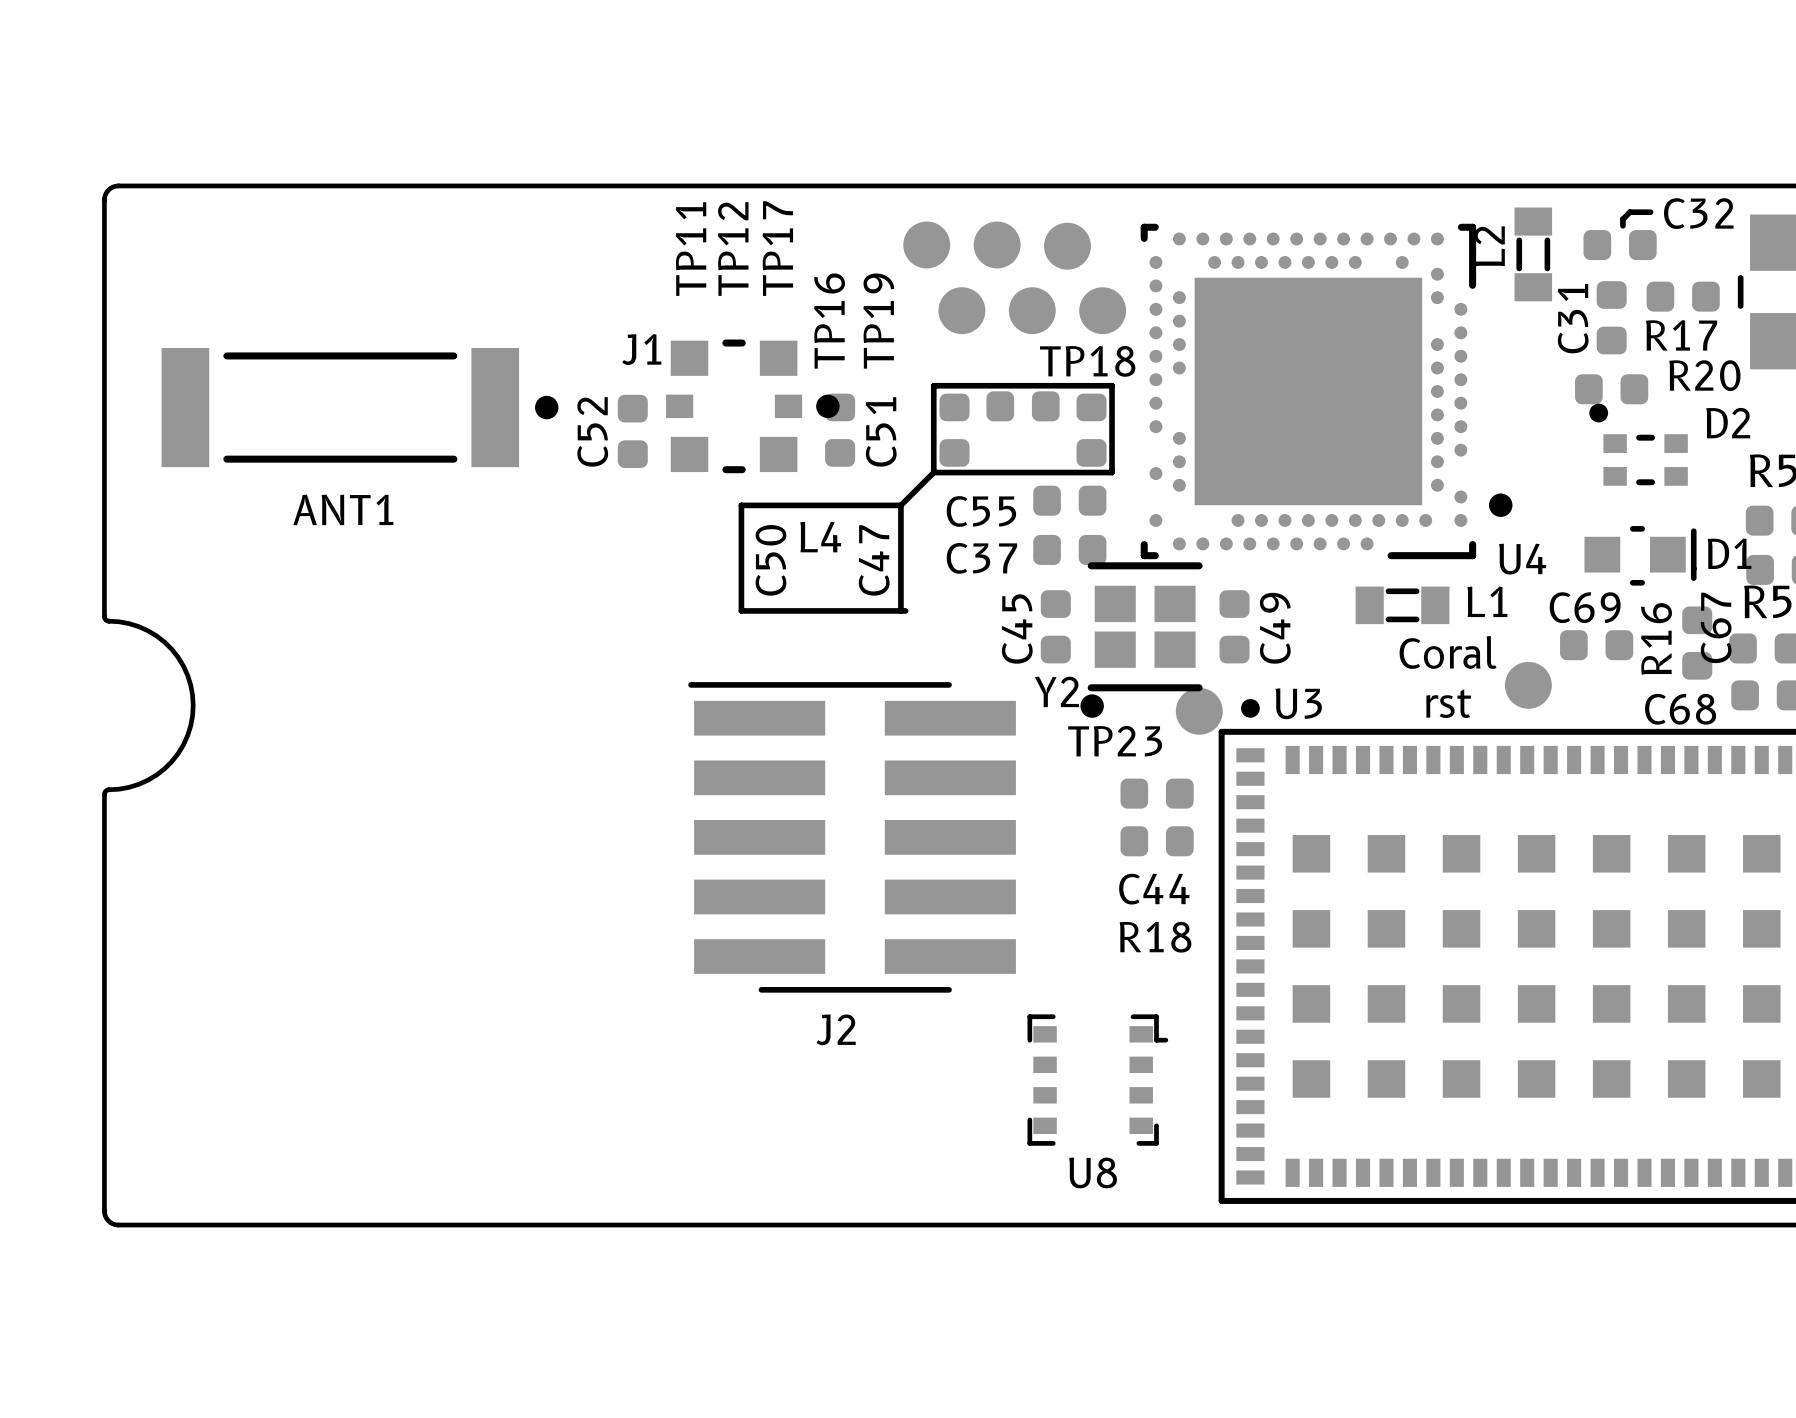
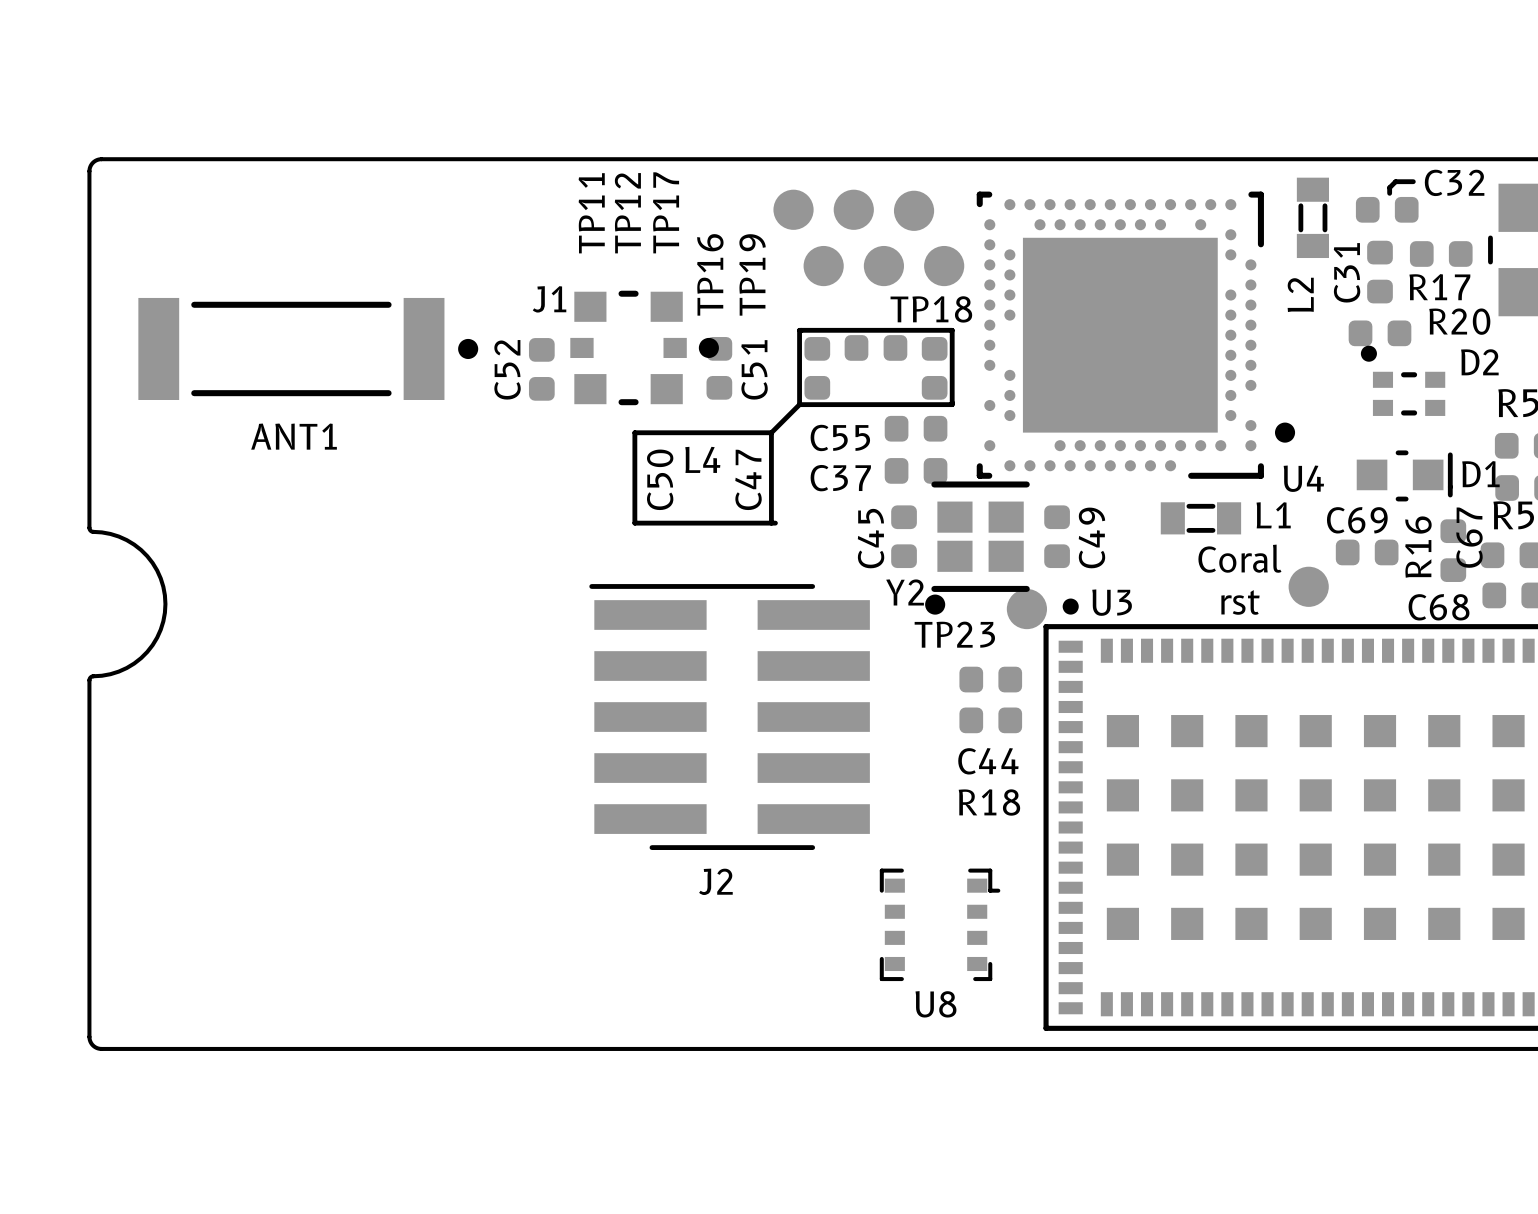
L2 name position: L2 (1489, 246) -> L2 (1300, 294)

